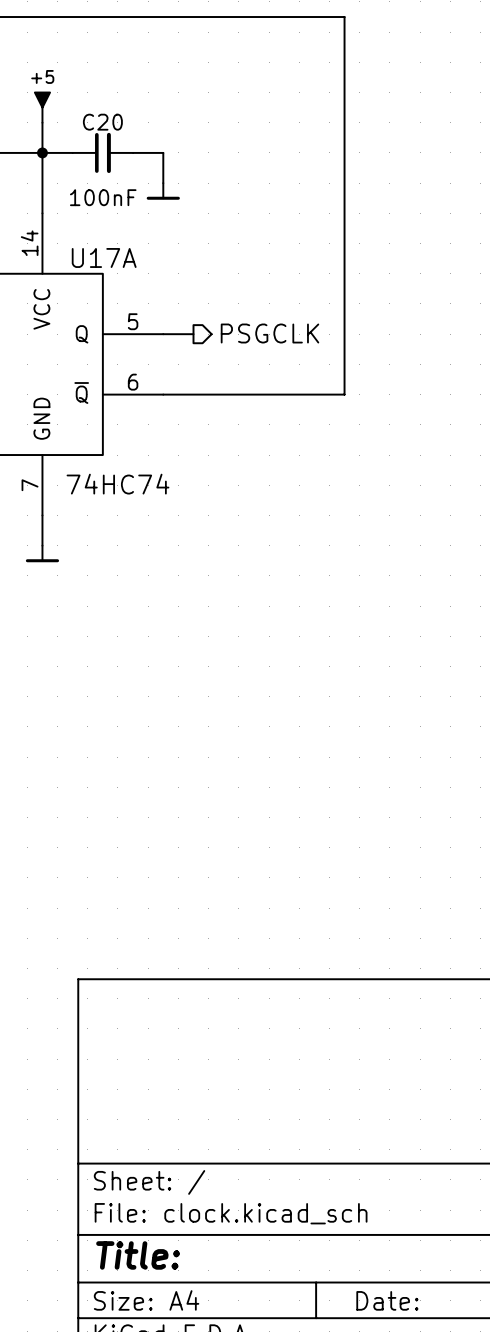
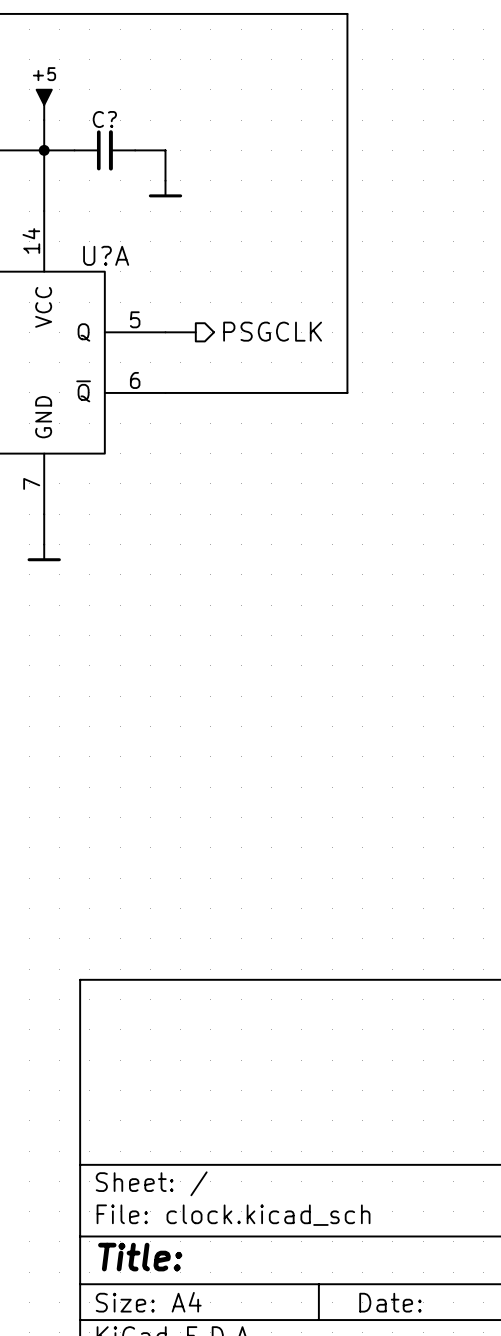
C20 name: C20 (102, 122) -> C? (104, 119)
C20 value: 100nF (103, 197) -> none
U17A name: U17A (104, 257) -> U?A (106, 255)
U17A value: 74HC74 (117, 484) -> none

